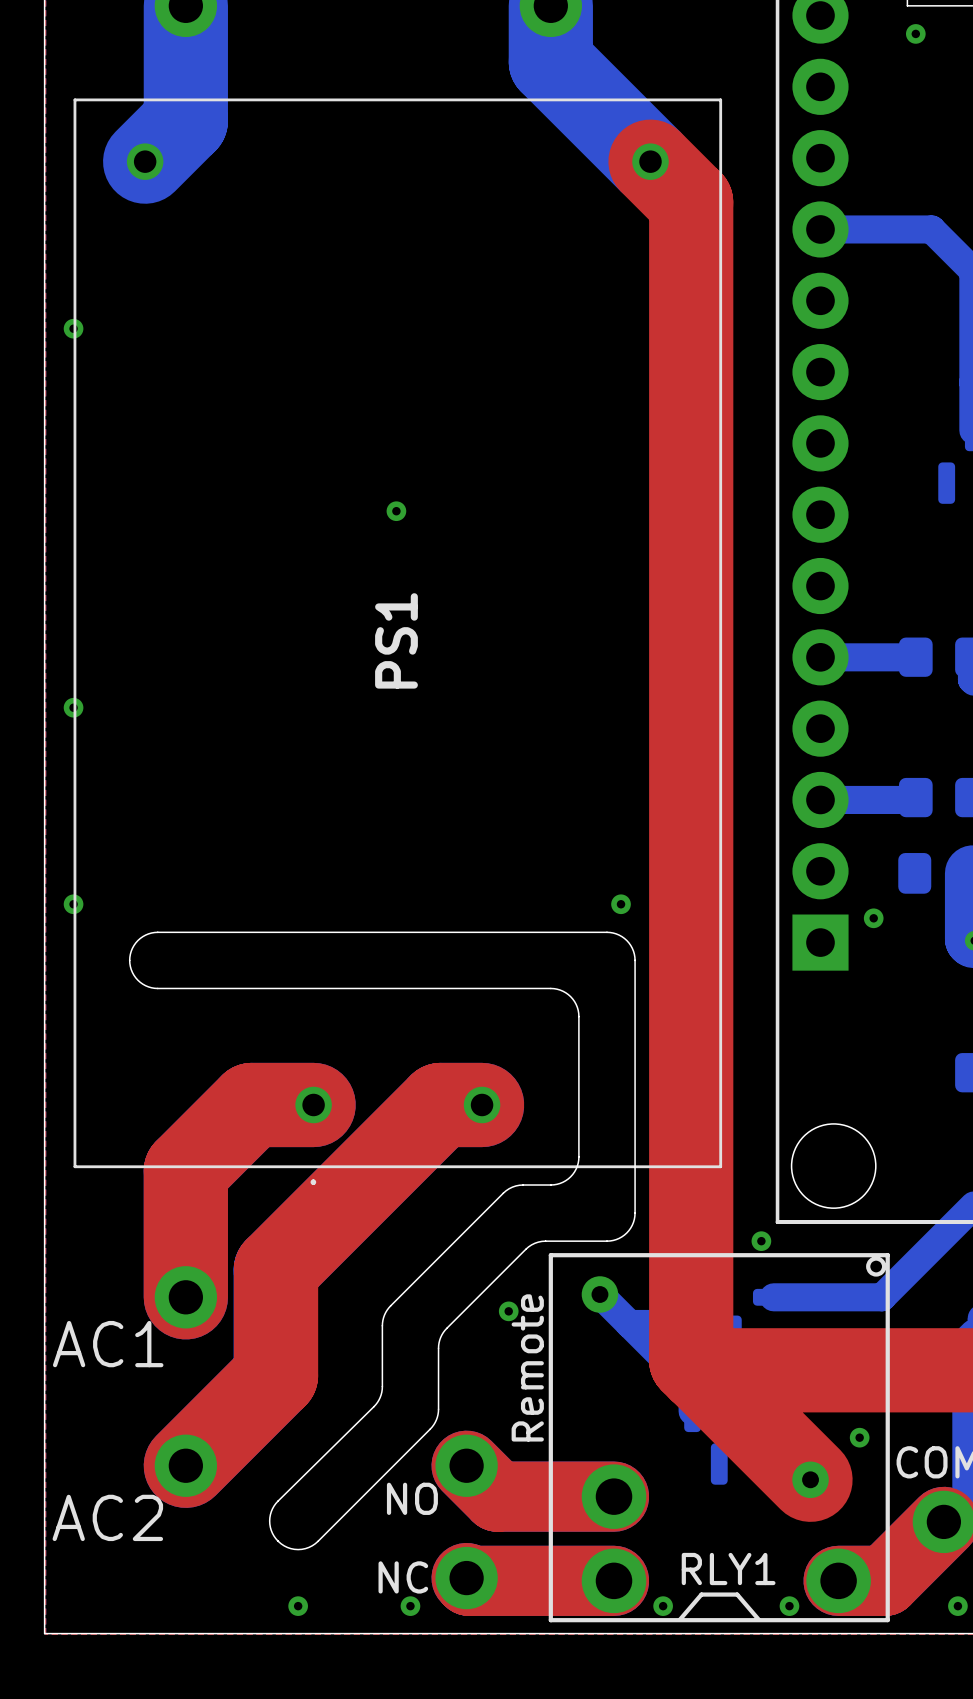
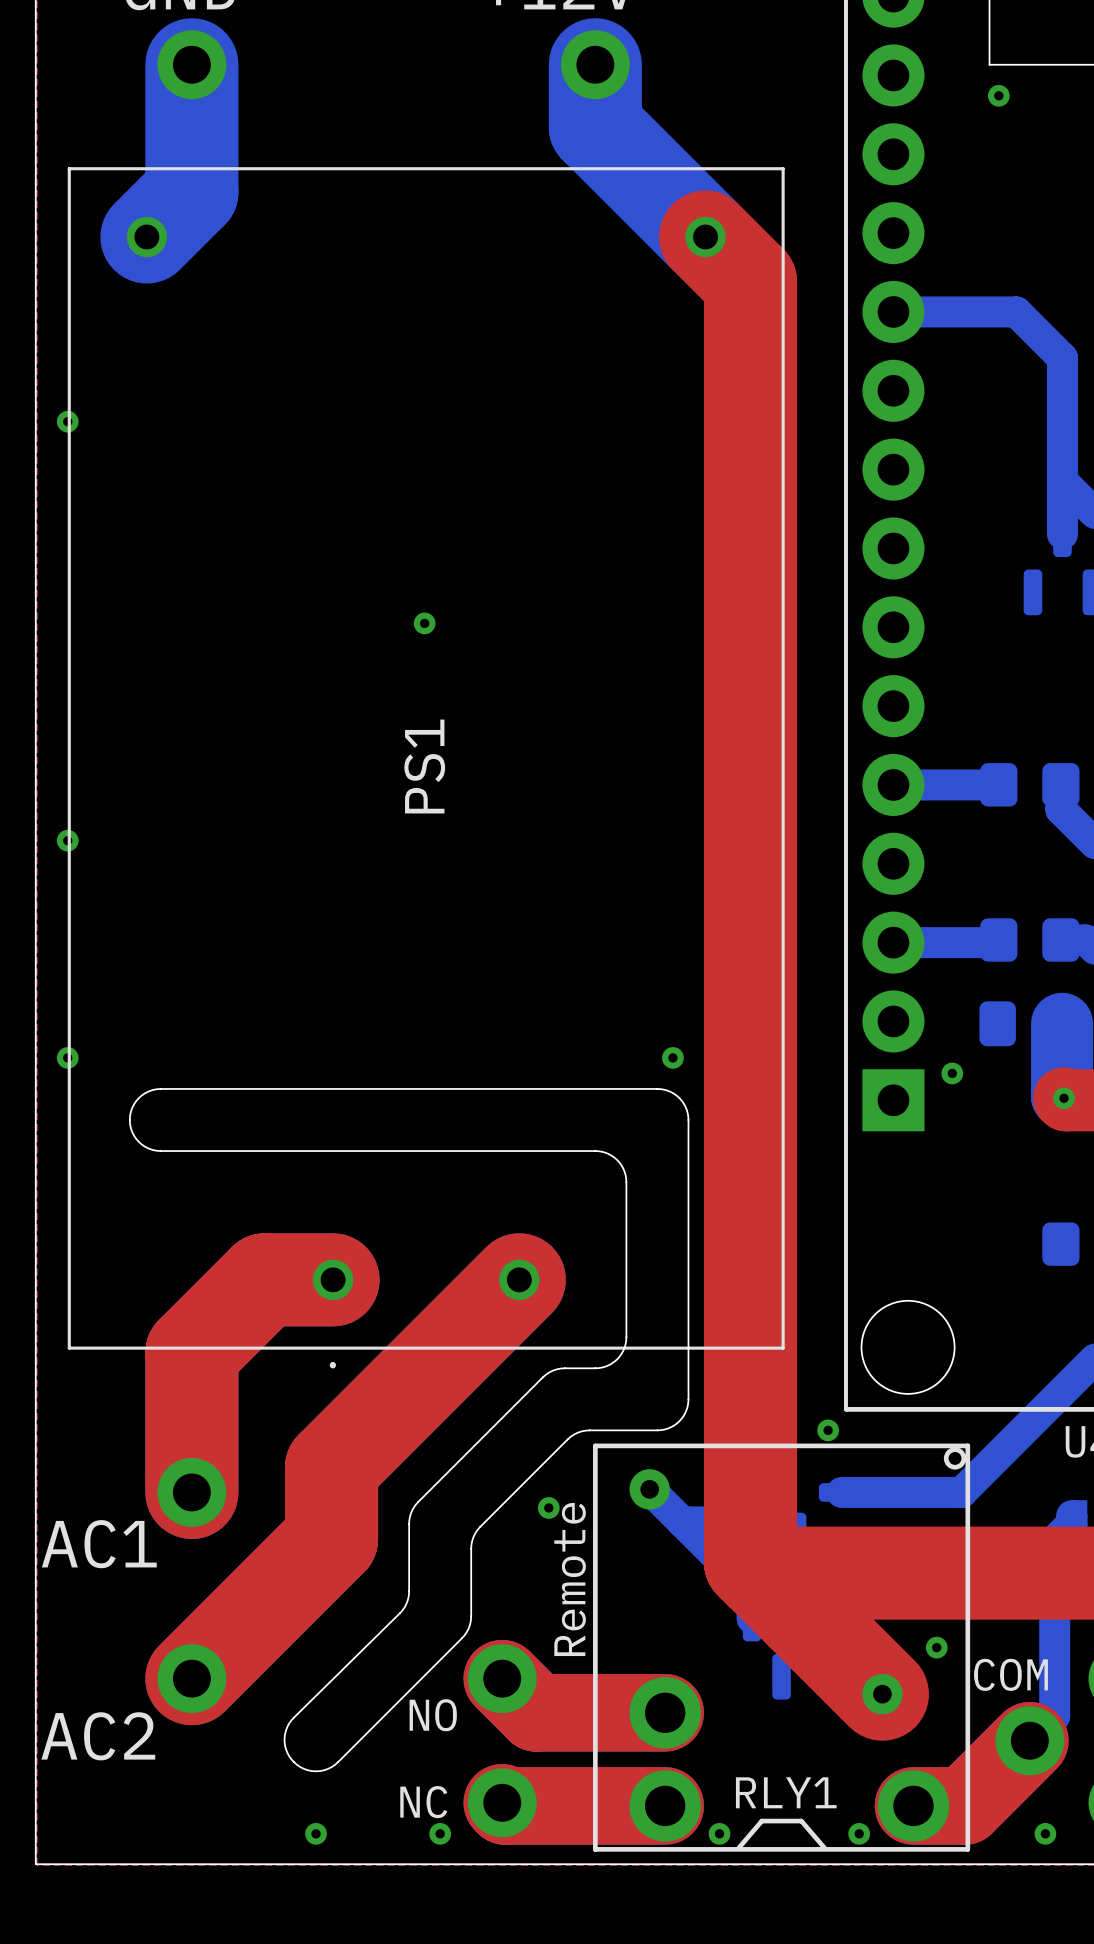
top track: (482, 1104) (440, 1104) (276, 1269) (276, 1375) -> (519, 1279) (331, 1467) (331, 1539) (291, 1578)

